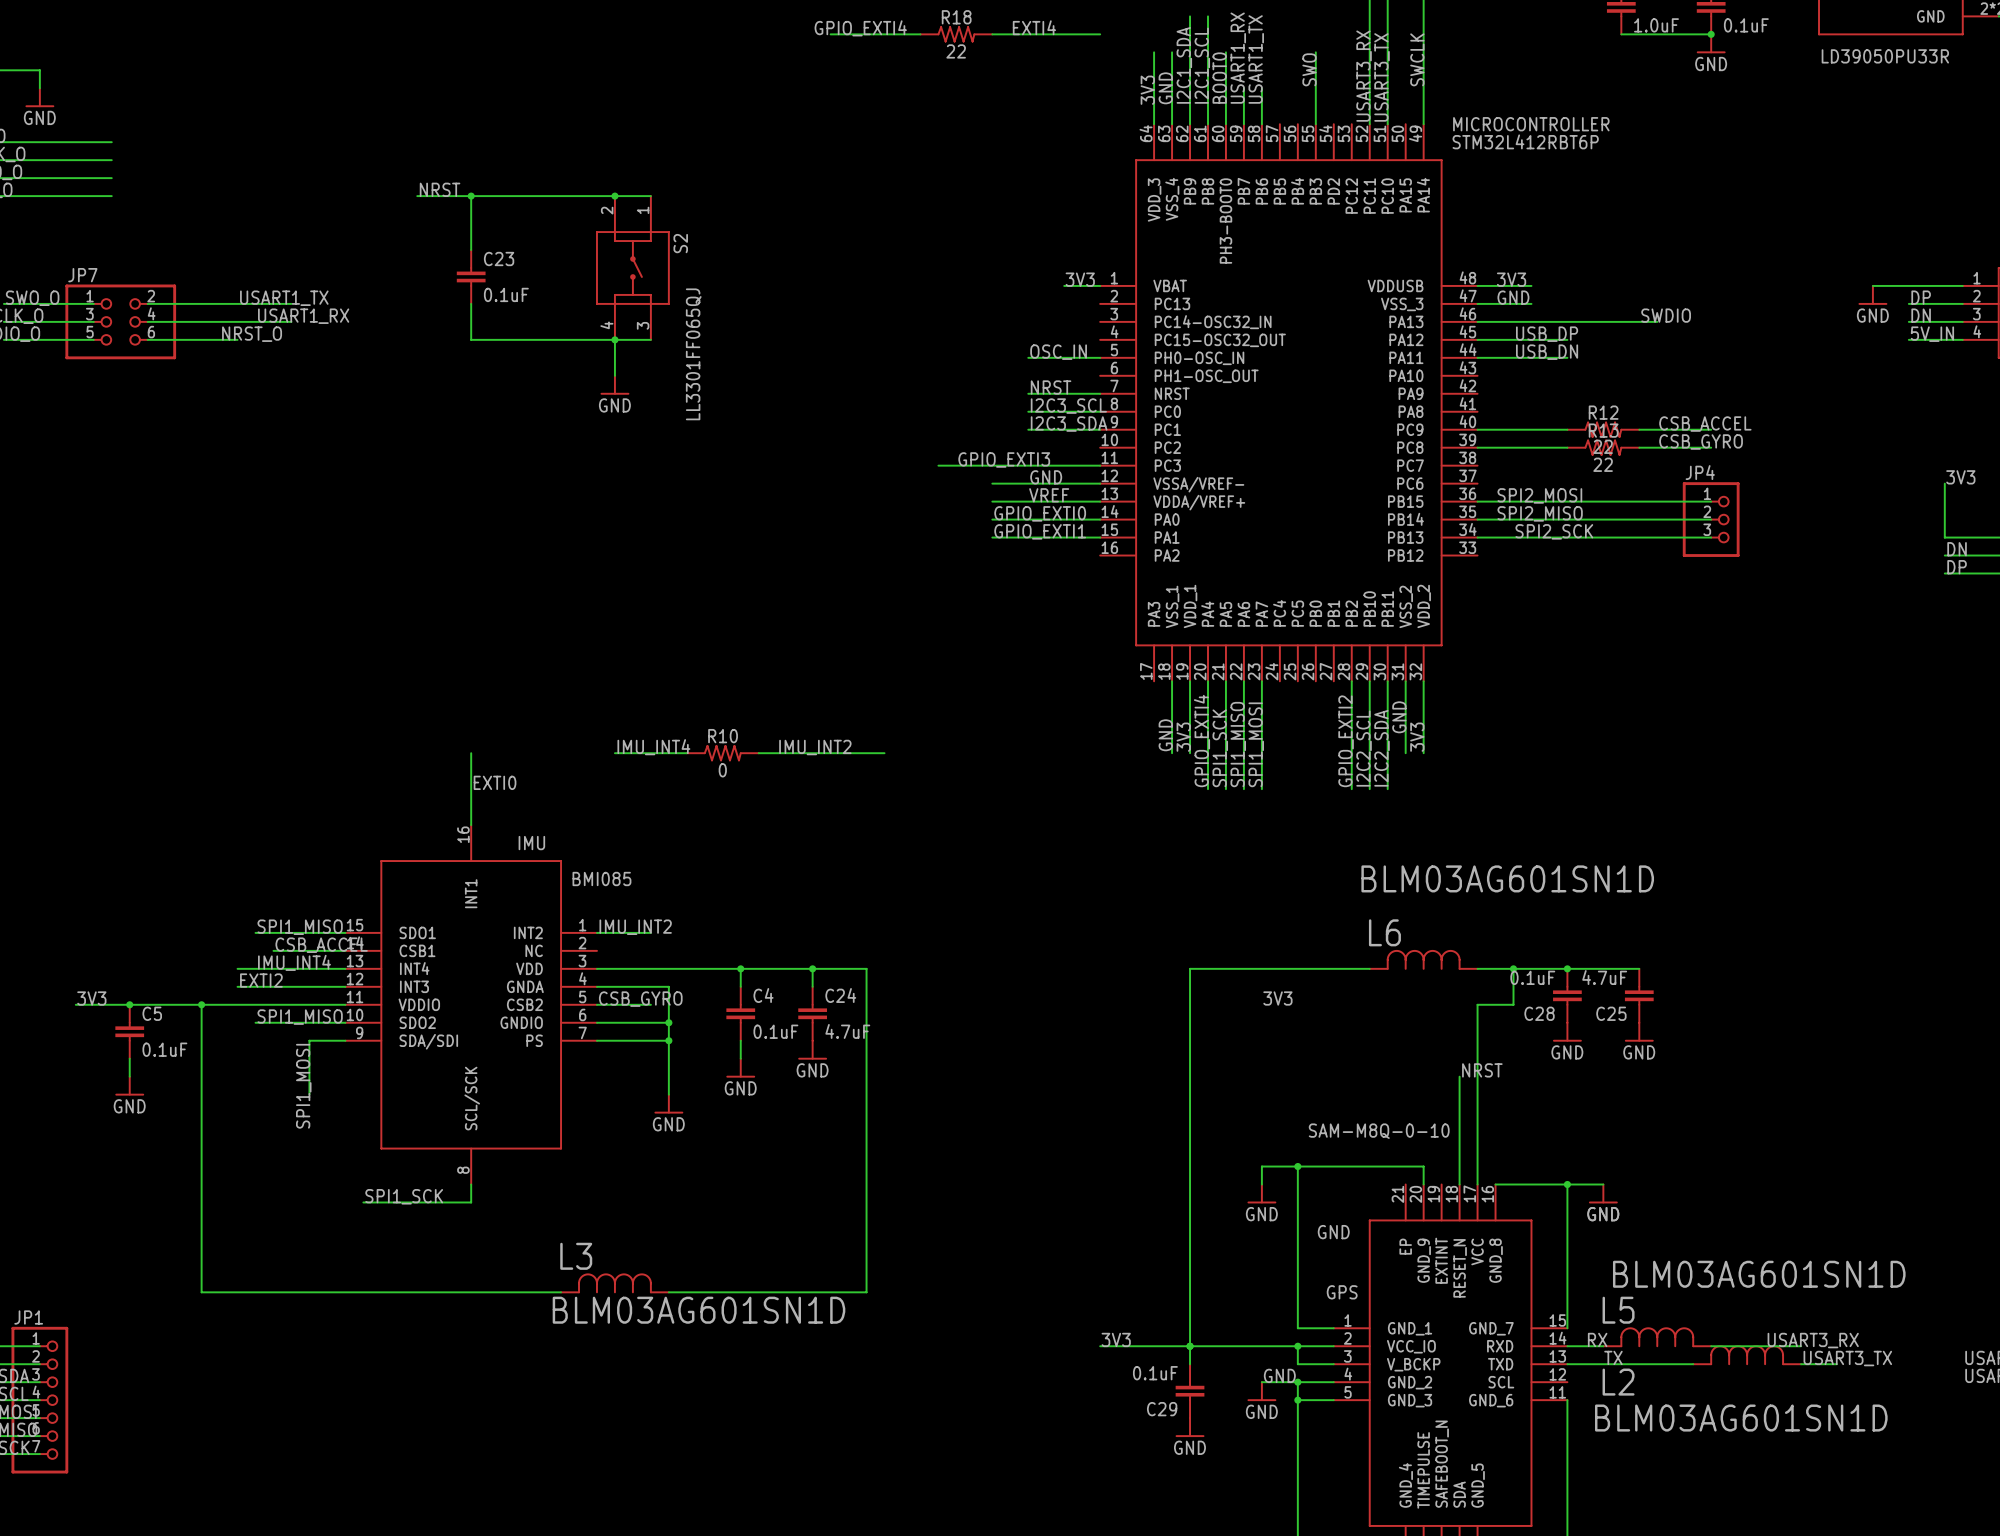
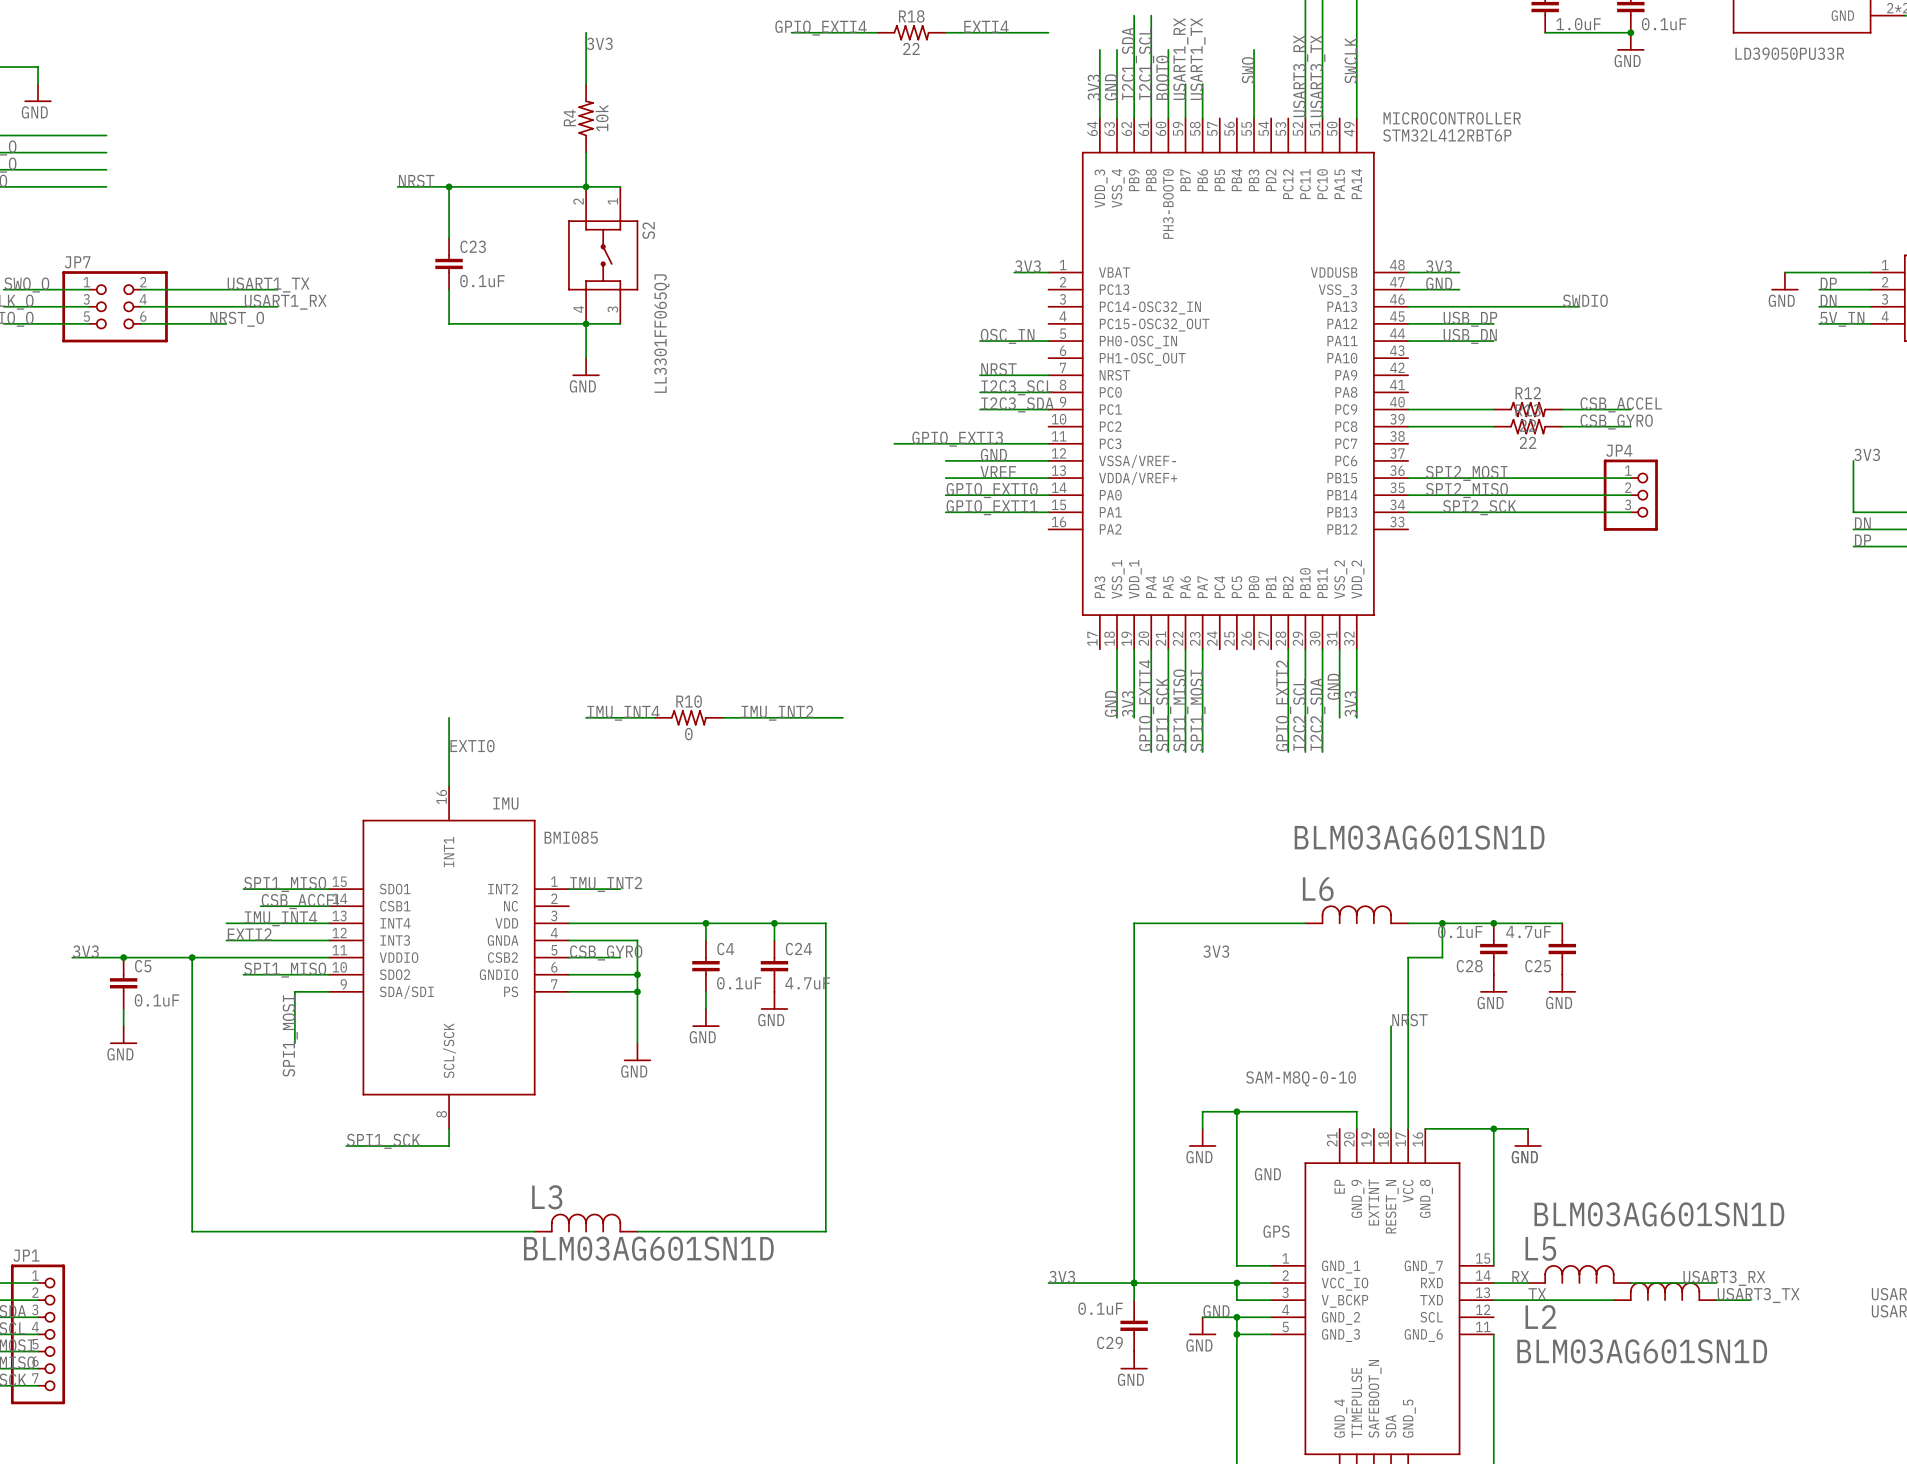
wire: none -> (586, 32) (586, 84)
label: none -> 3V3 (599, 43)
R4: none -> 10k (586, 118)
wire: none -> (586, 152) (586, 186)

